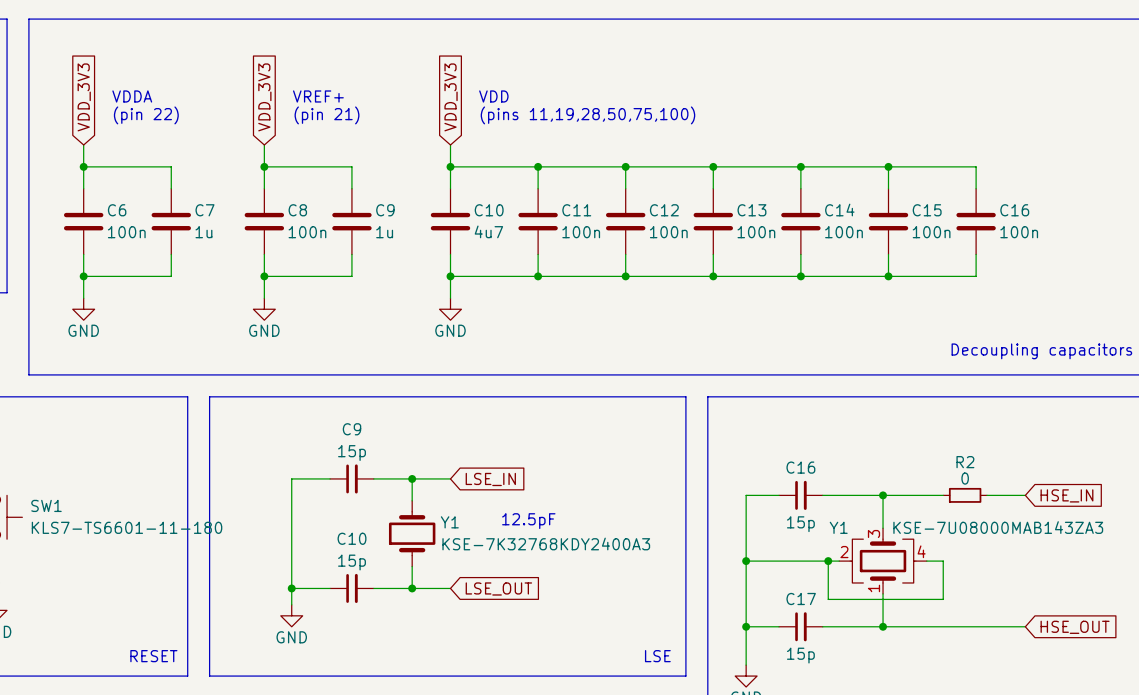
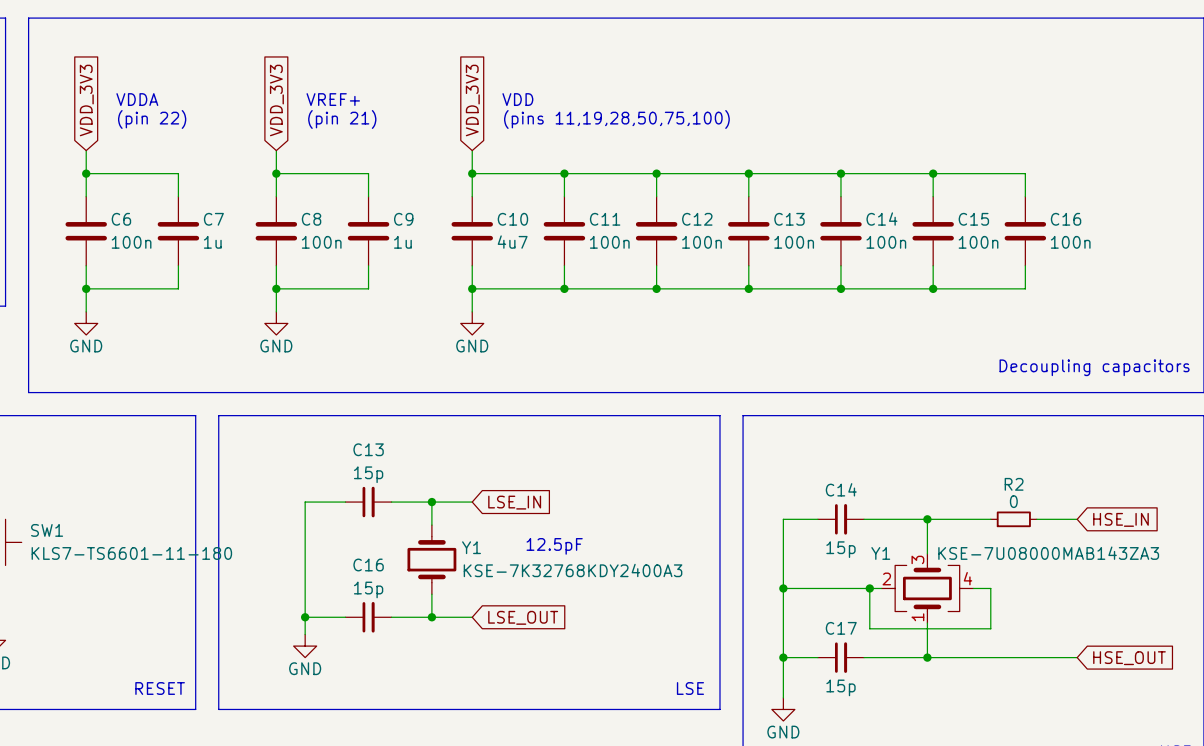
C9 name: C9 (352, 429) -> C13 (368, 449)
C16 name: C16 (800, 467) -> C14 (841, 489)
C10 name: C10 (352, 538) -> C16 (368, 564)

